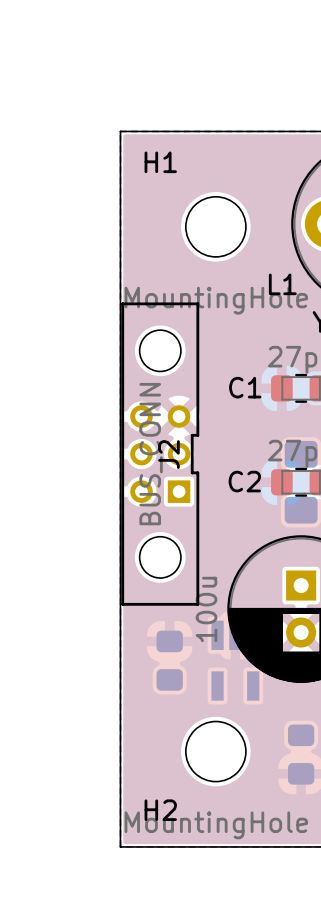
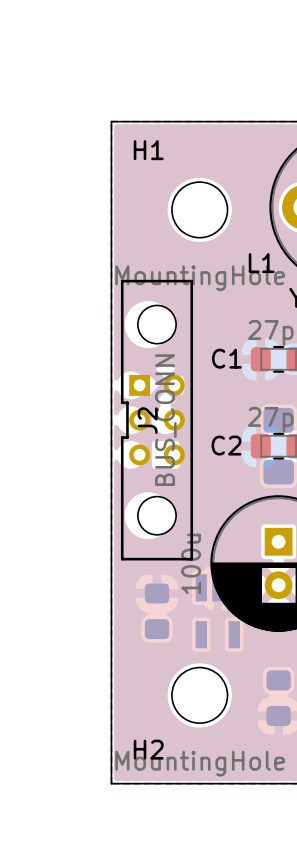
J2 rotation: 0° (160, 454) -> 180° (156, 420)

